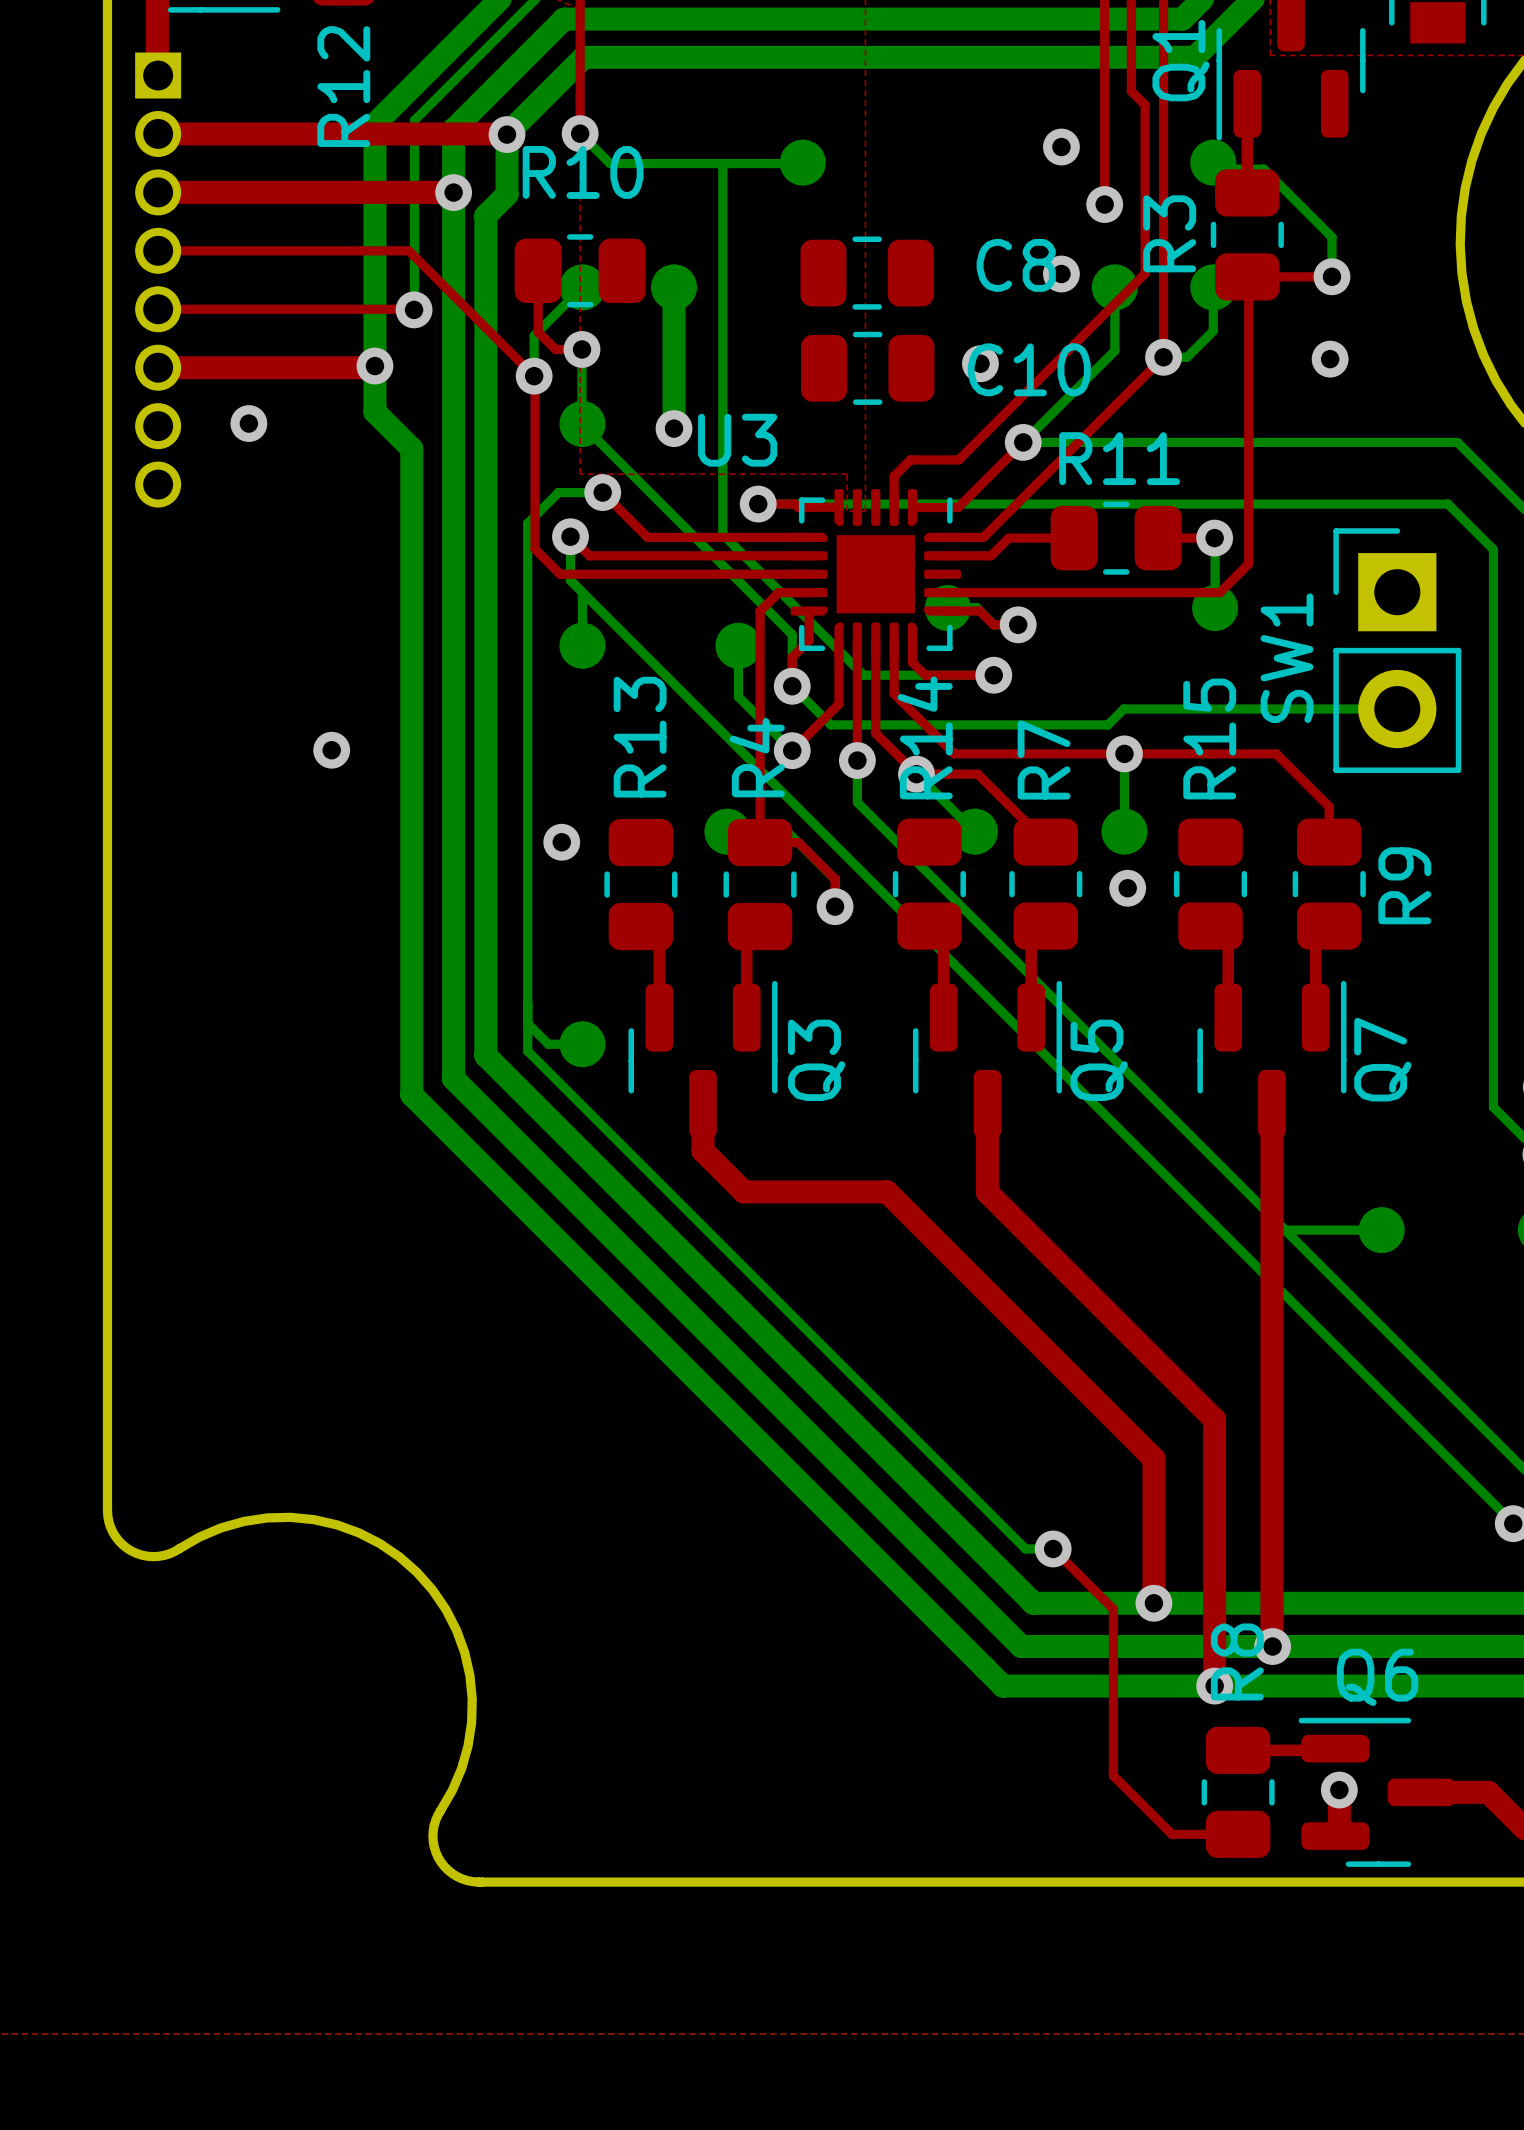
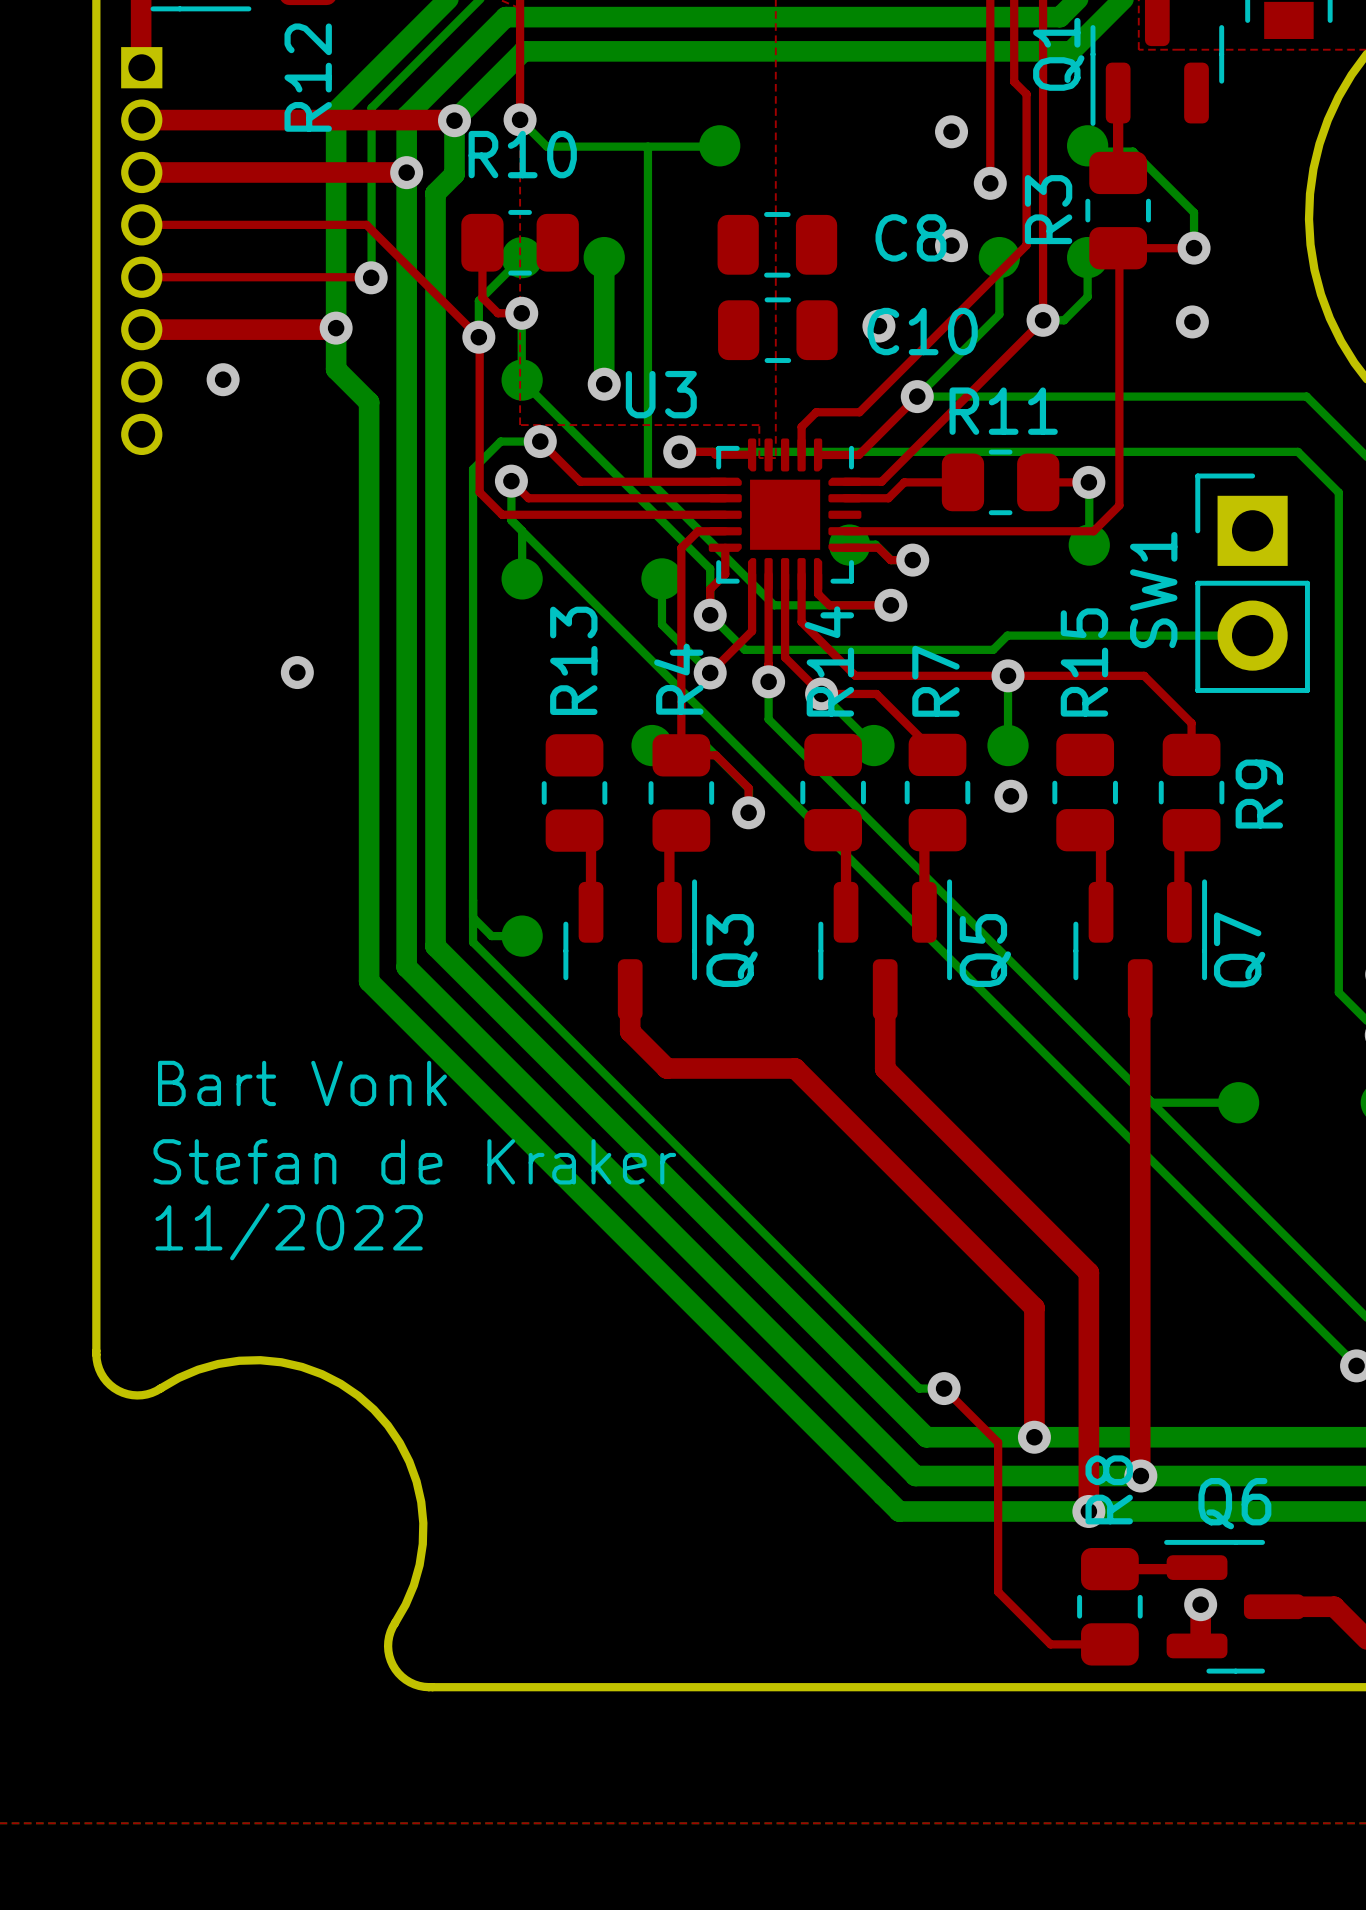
via: (561, 842) -> none
text: none -> Bart Vonk (302, 1083)
text: none -> Stefan de Kraker (414, 1161)
text: none -> 11/2022 (289, 1231)

